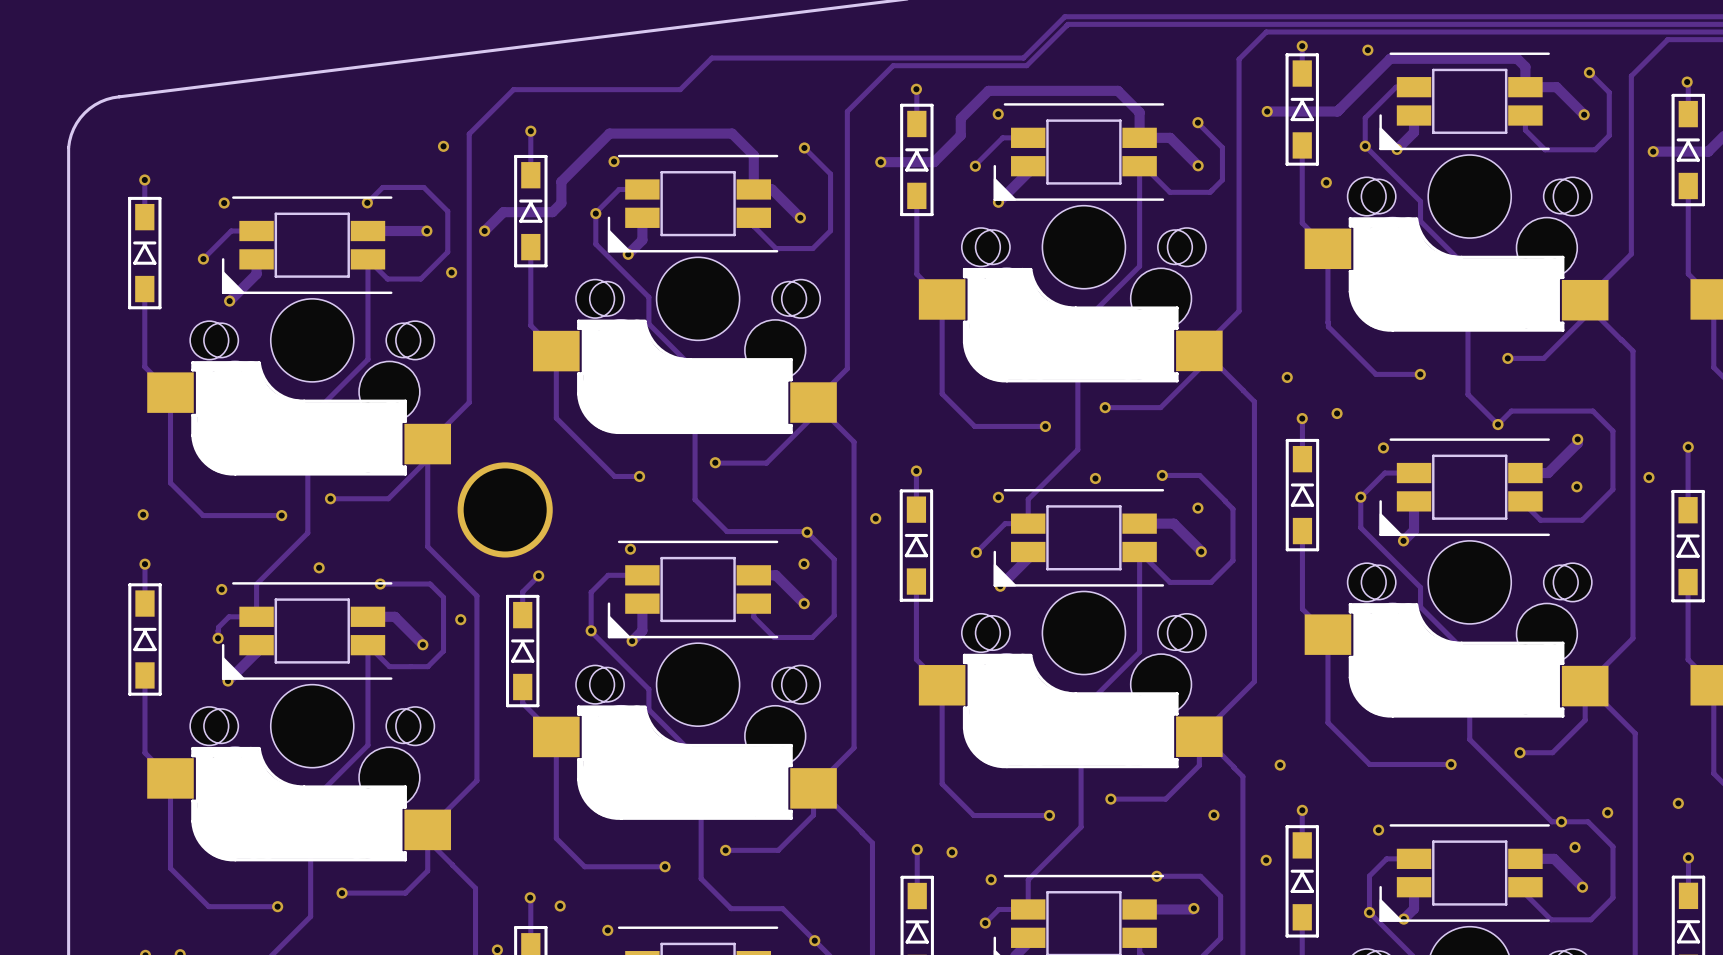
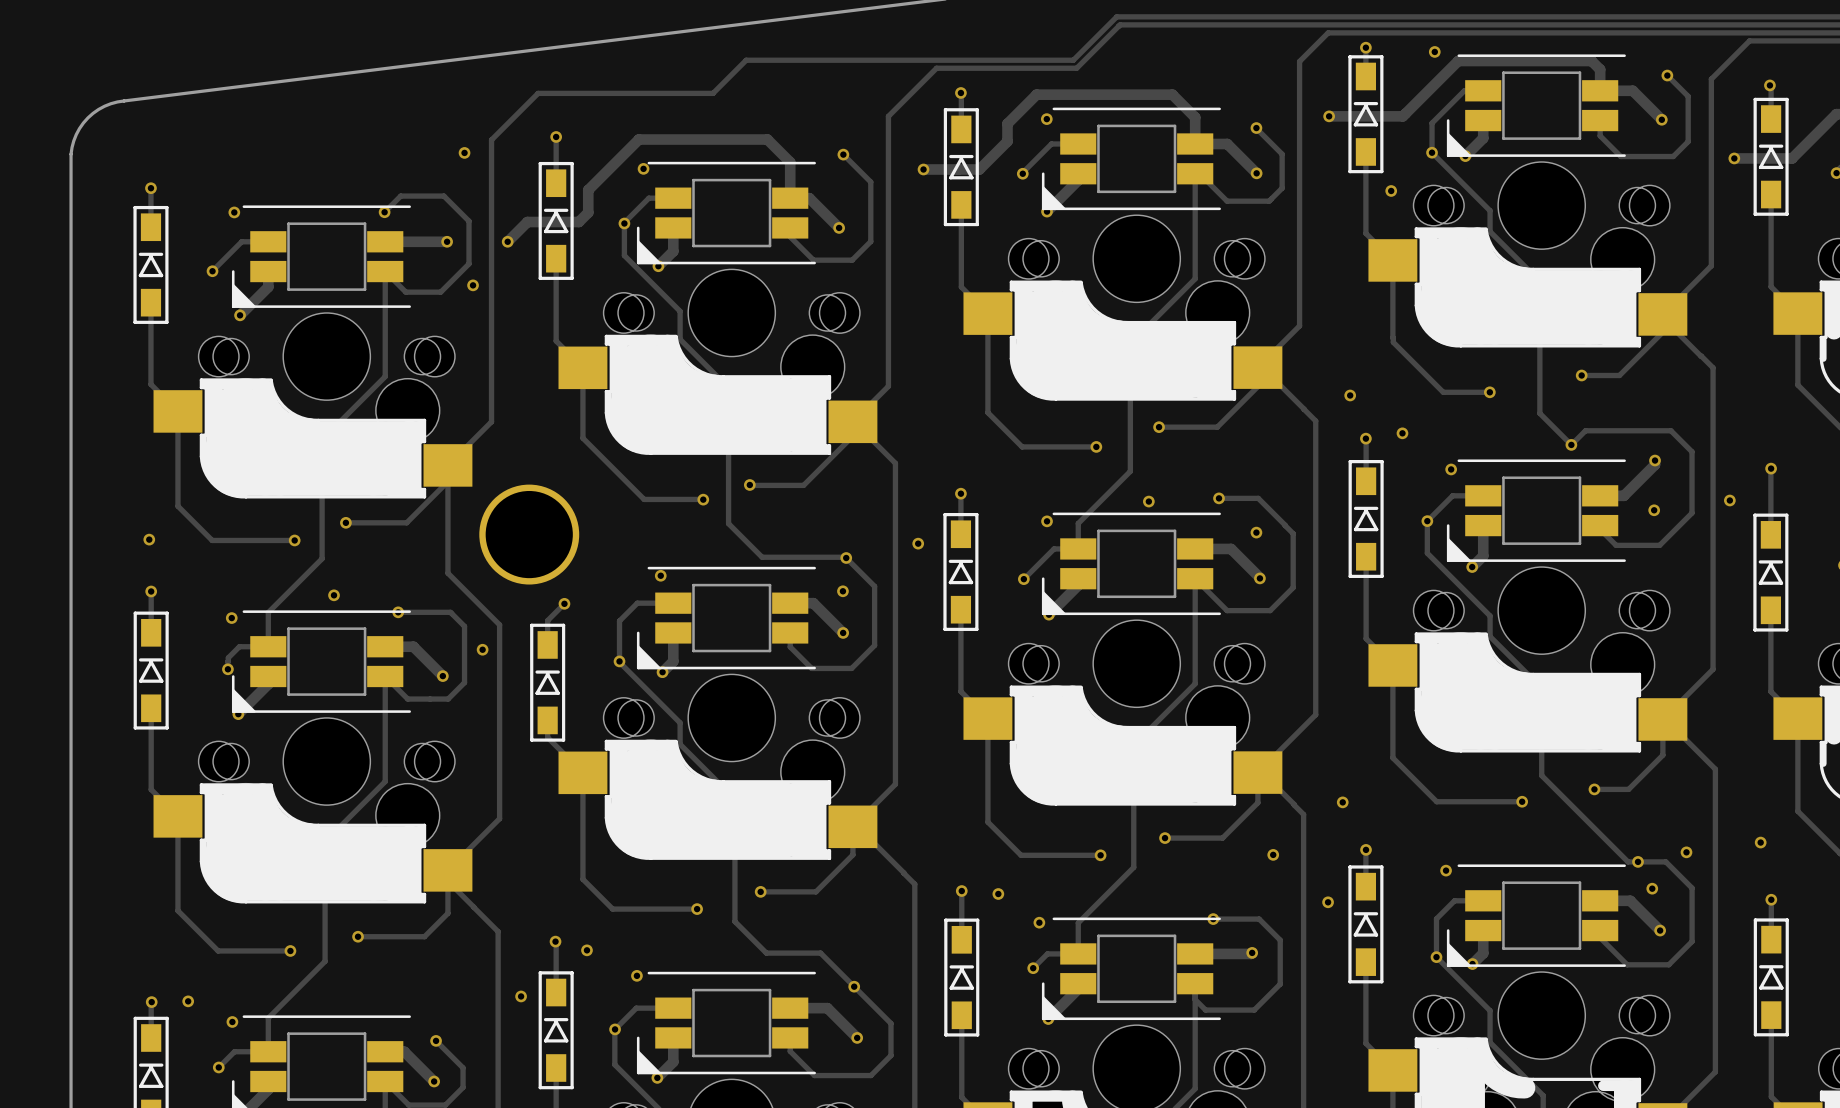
via position: (639, 476) -> (703, 499)
track: none -> (703, 499) (670, 499)

